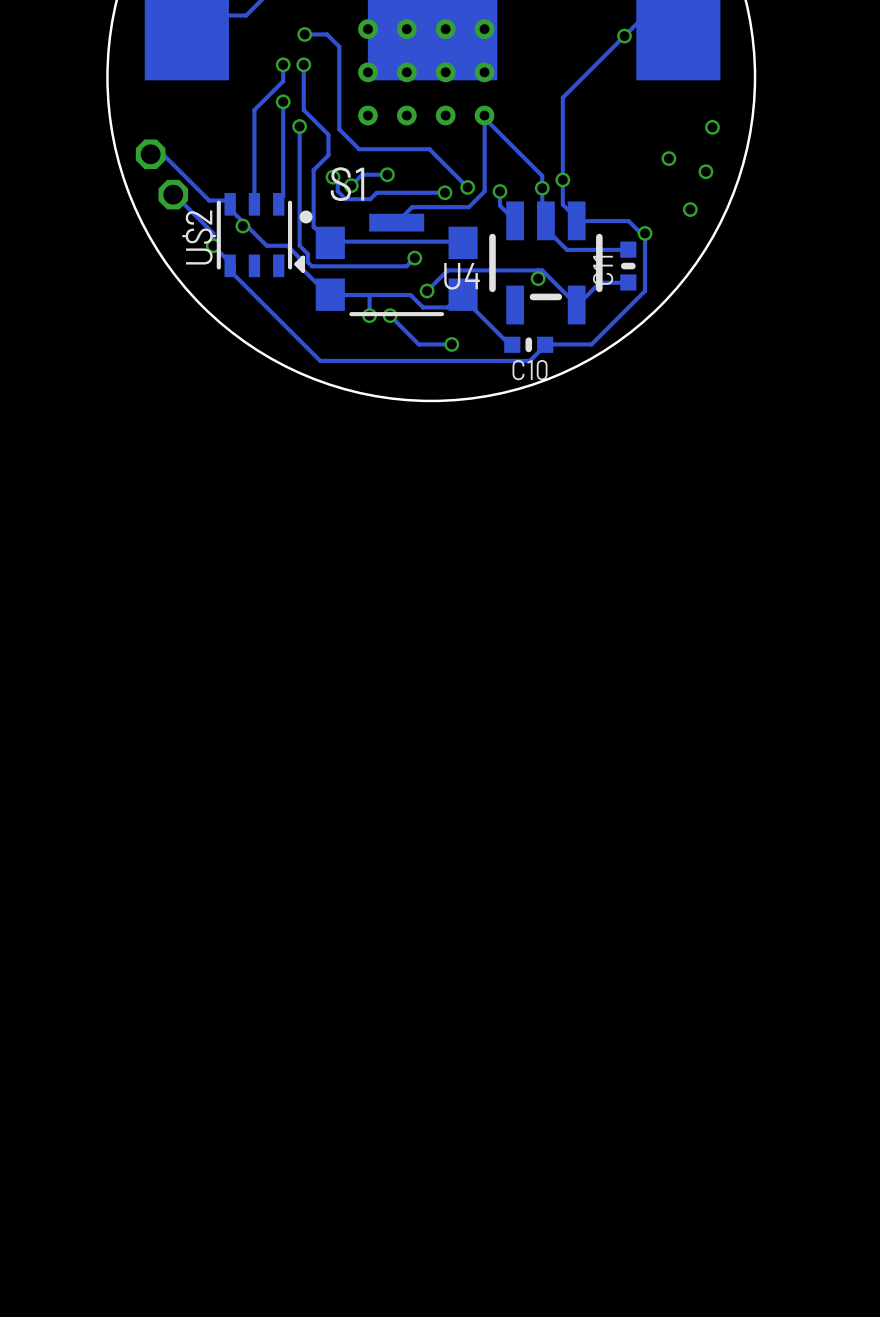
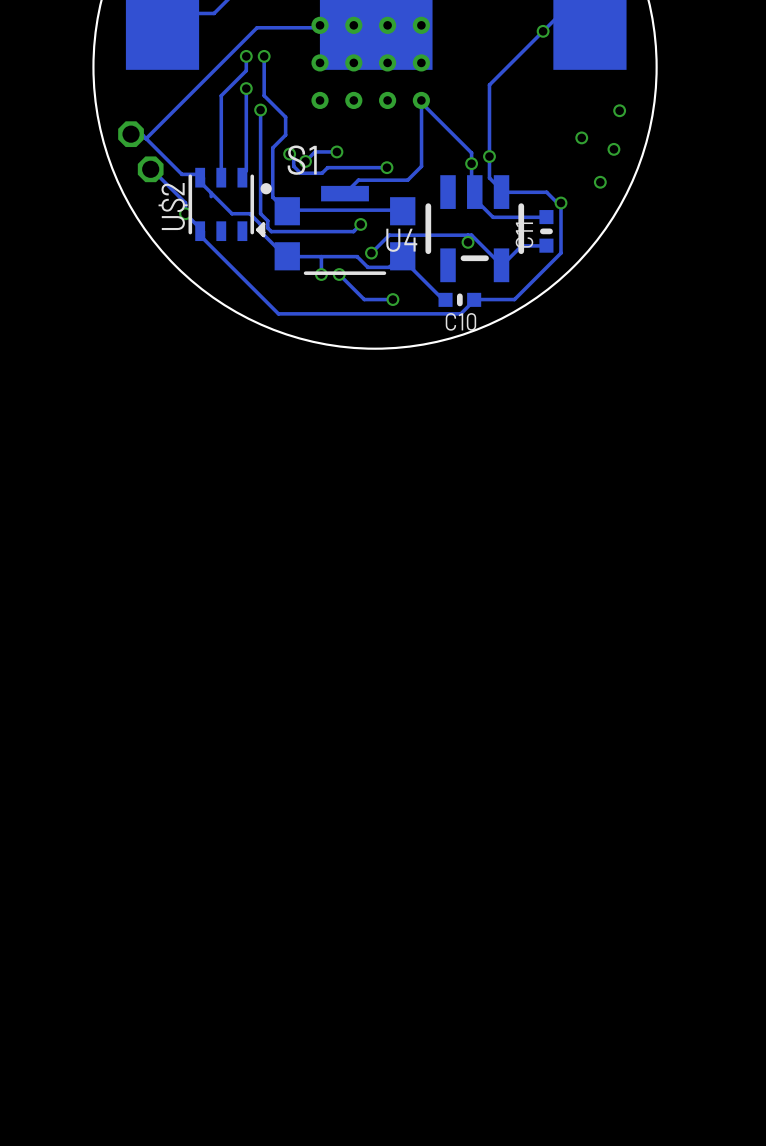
track: none -> (320, 25) (317, 27) (257, 27) (146, 138)
track: (304, 34) (327, 34) (339, 46) (339, 129) (359, 149) (429, 149) (467, 187) -> none
via: (304, 34) -> none
via: (467, 187) -> none
track: (500, 191) (500, 205) (515, 220) -> none
via: (500, 191) -> none
via: (242, 226) -> none

